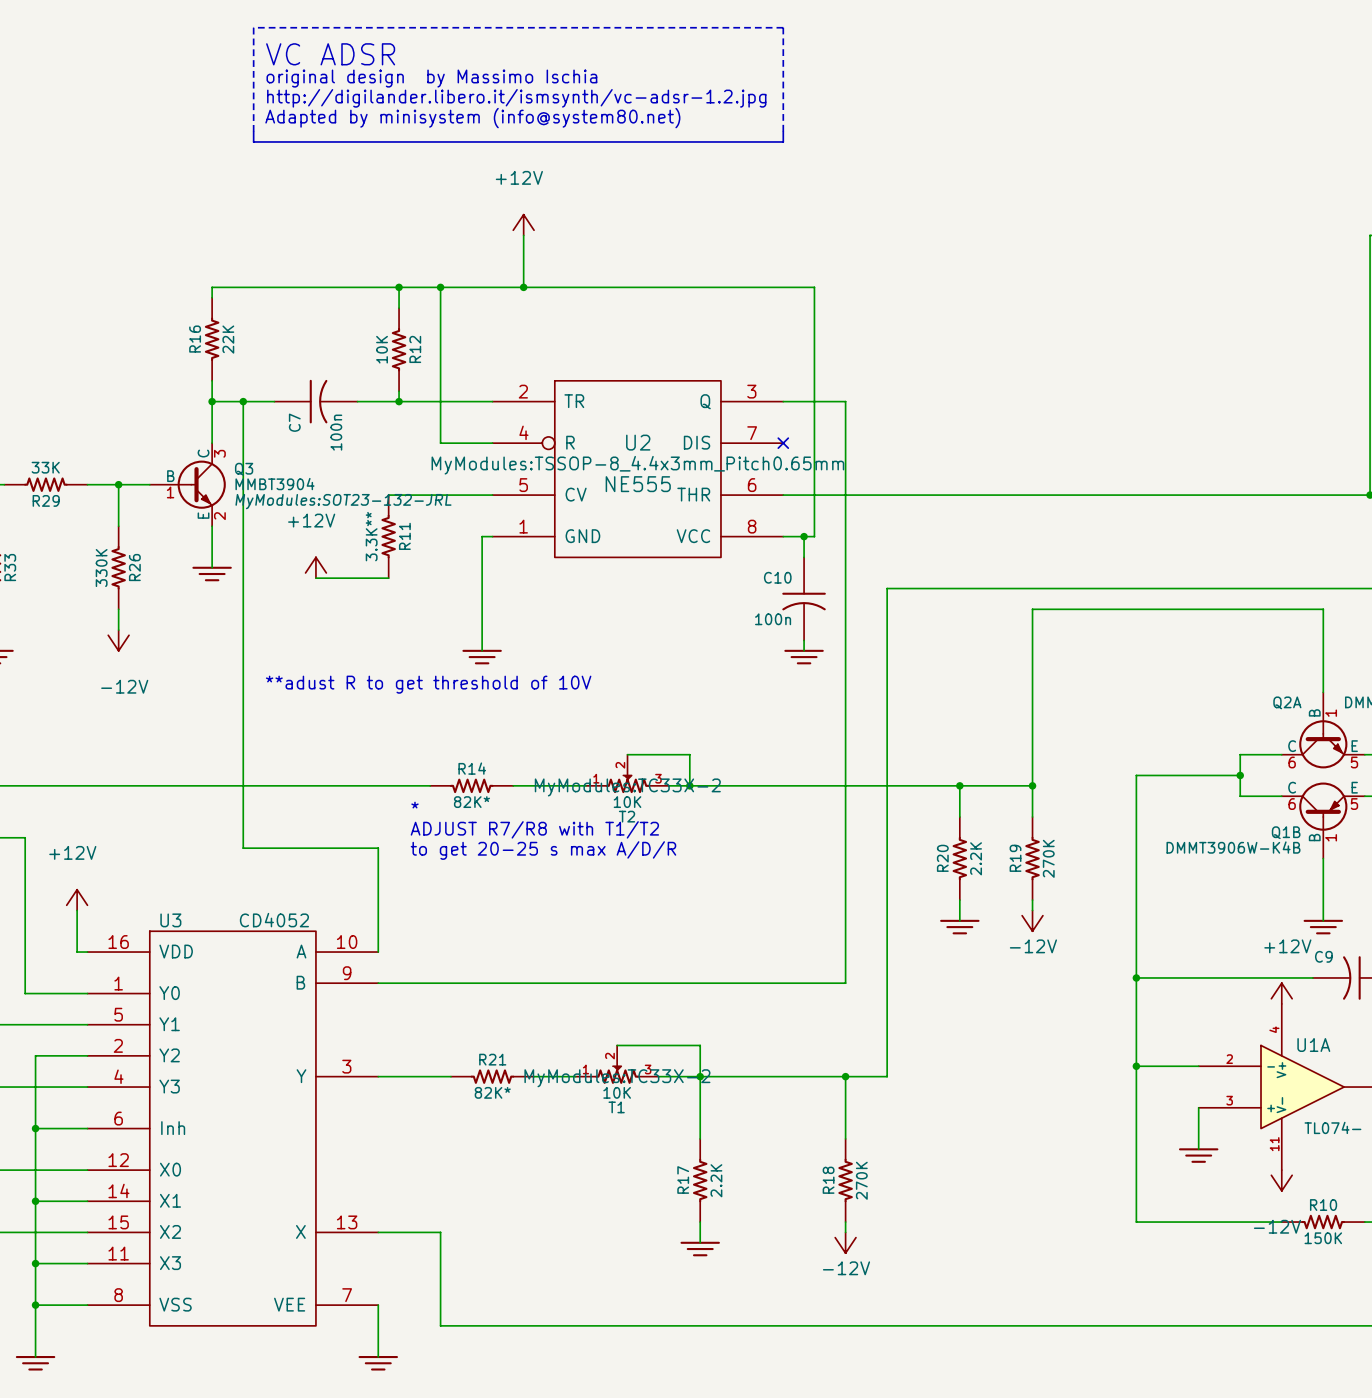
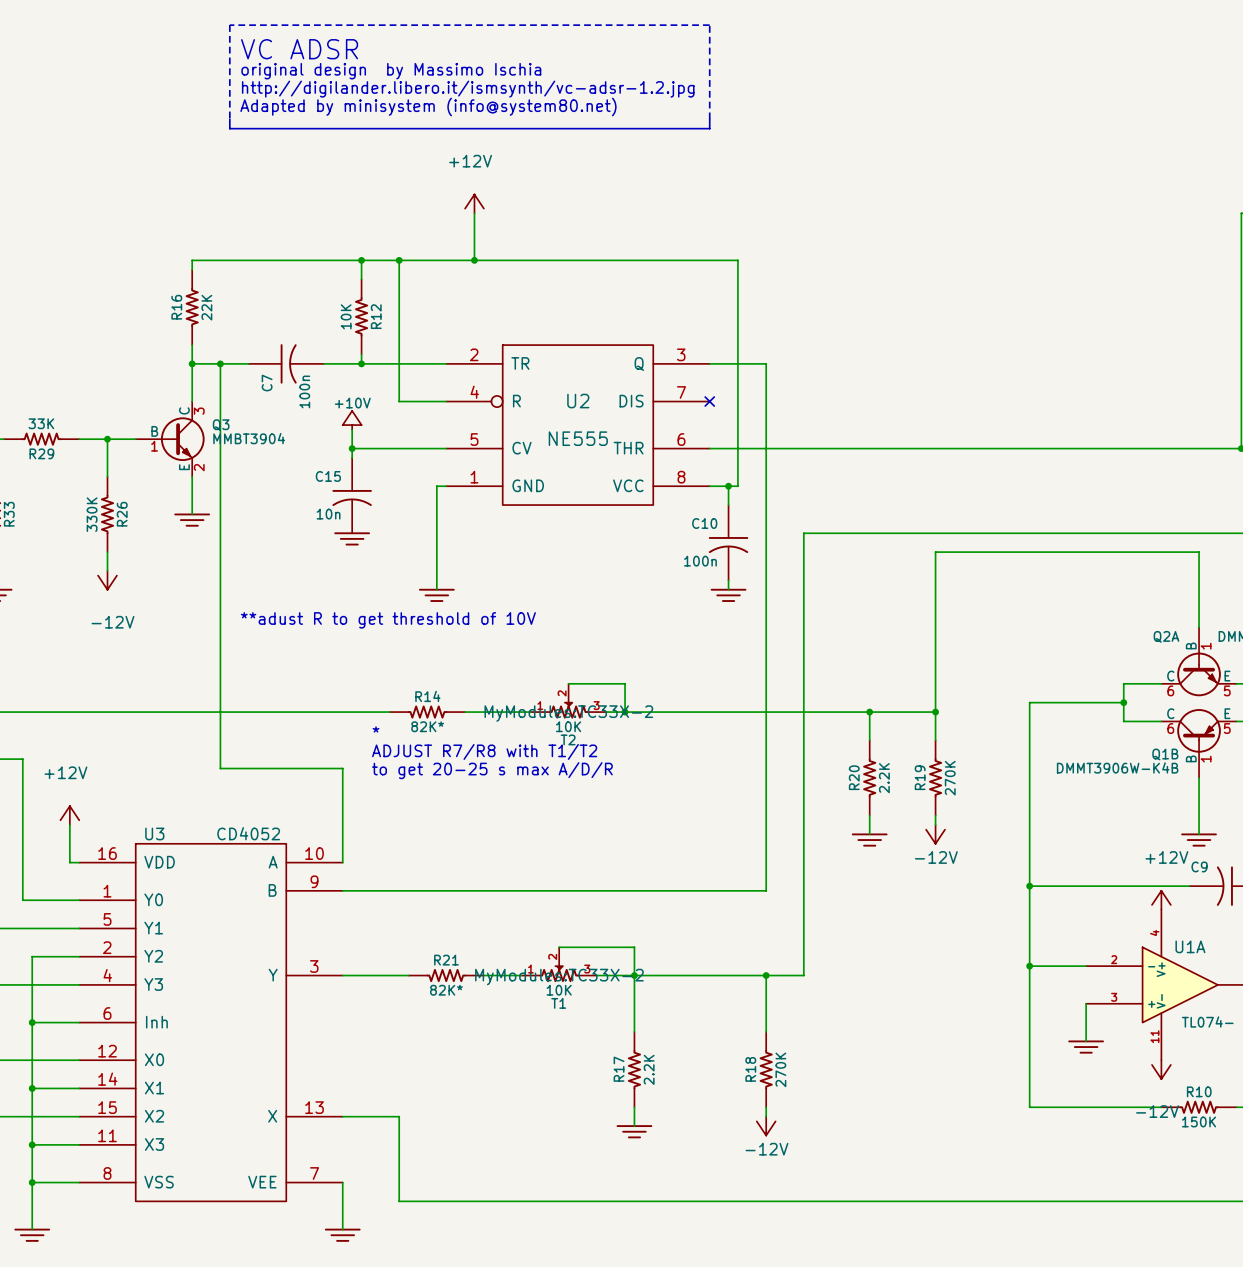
power symbol: none -> +10V (352, 420)
U2 text: MyModules:TSSOP-8_4.4x3mm_Pitch0.65mm (637, 465) -> none
wire: none -> (352, 429) (352, 457)
junction: none -> (352, 448)
Q3 text: MyModules:SOT23-132-JRL (343, 501) -> none
R11: 3.3K** (388, 536) -> none
C15: none -> 10n (352, 495)
power symbol: +12V (315, 567) -> none
wire: (315, 578) (388, 578) -> none
power symbol: none -> (352, 538)

